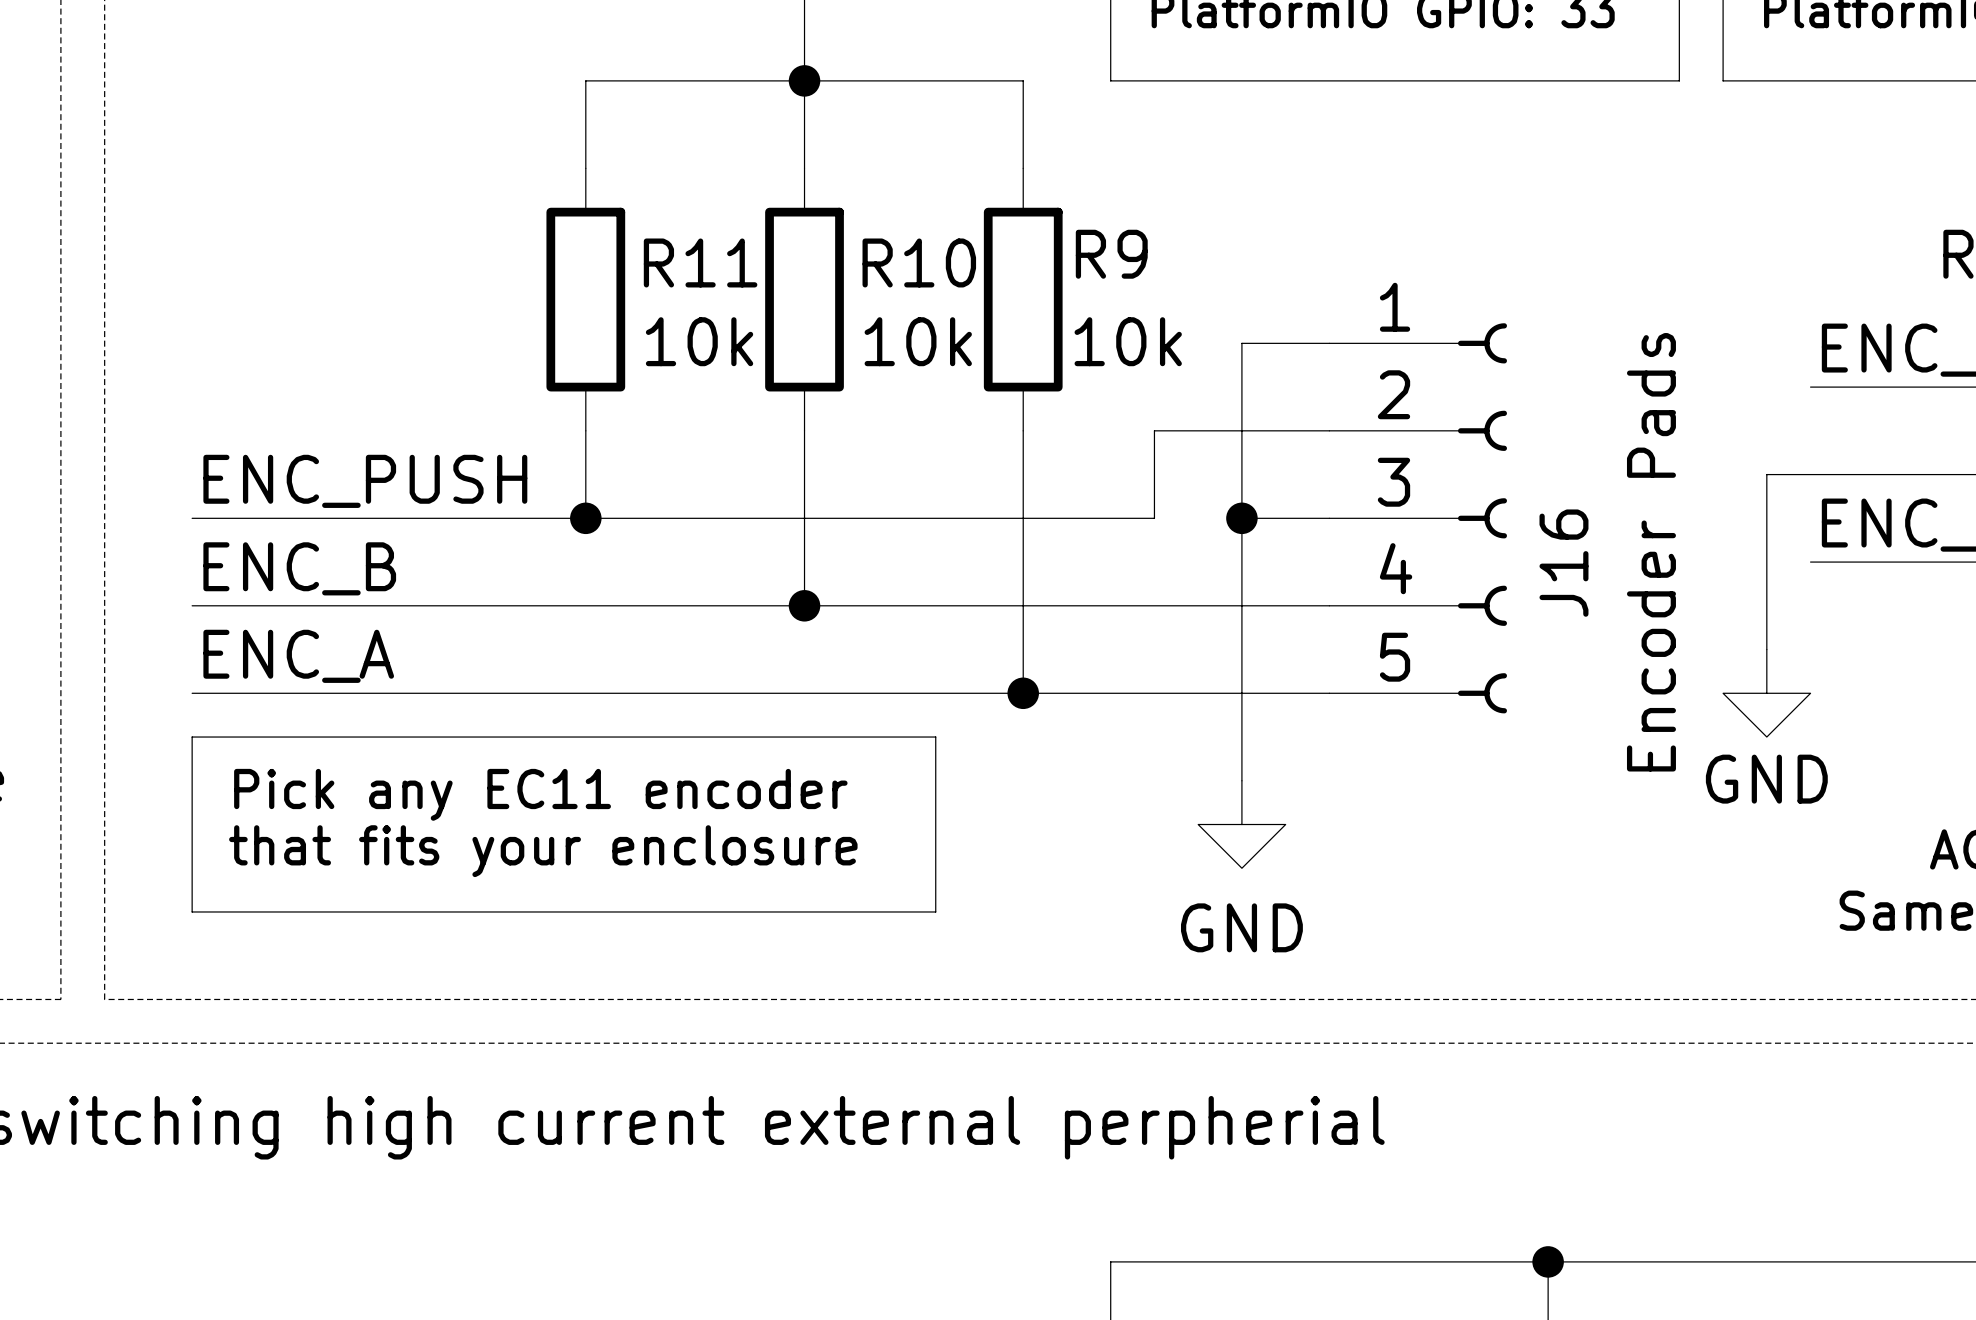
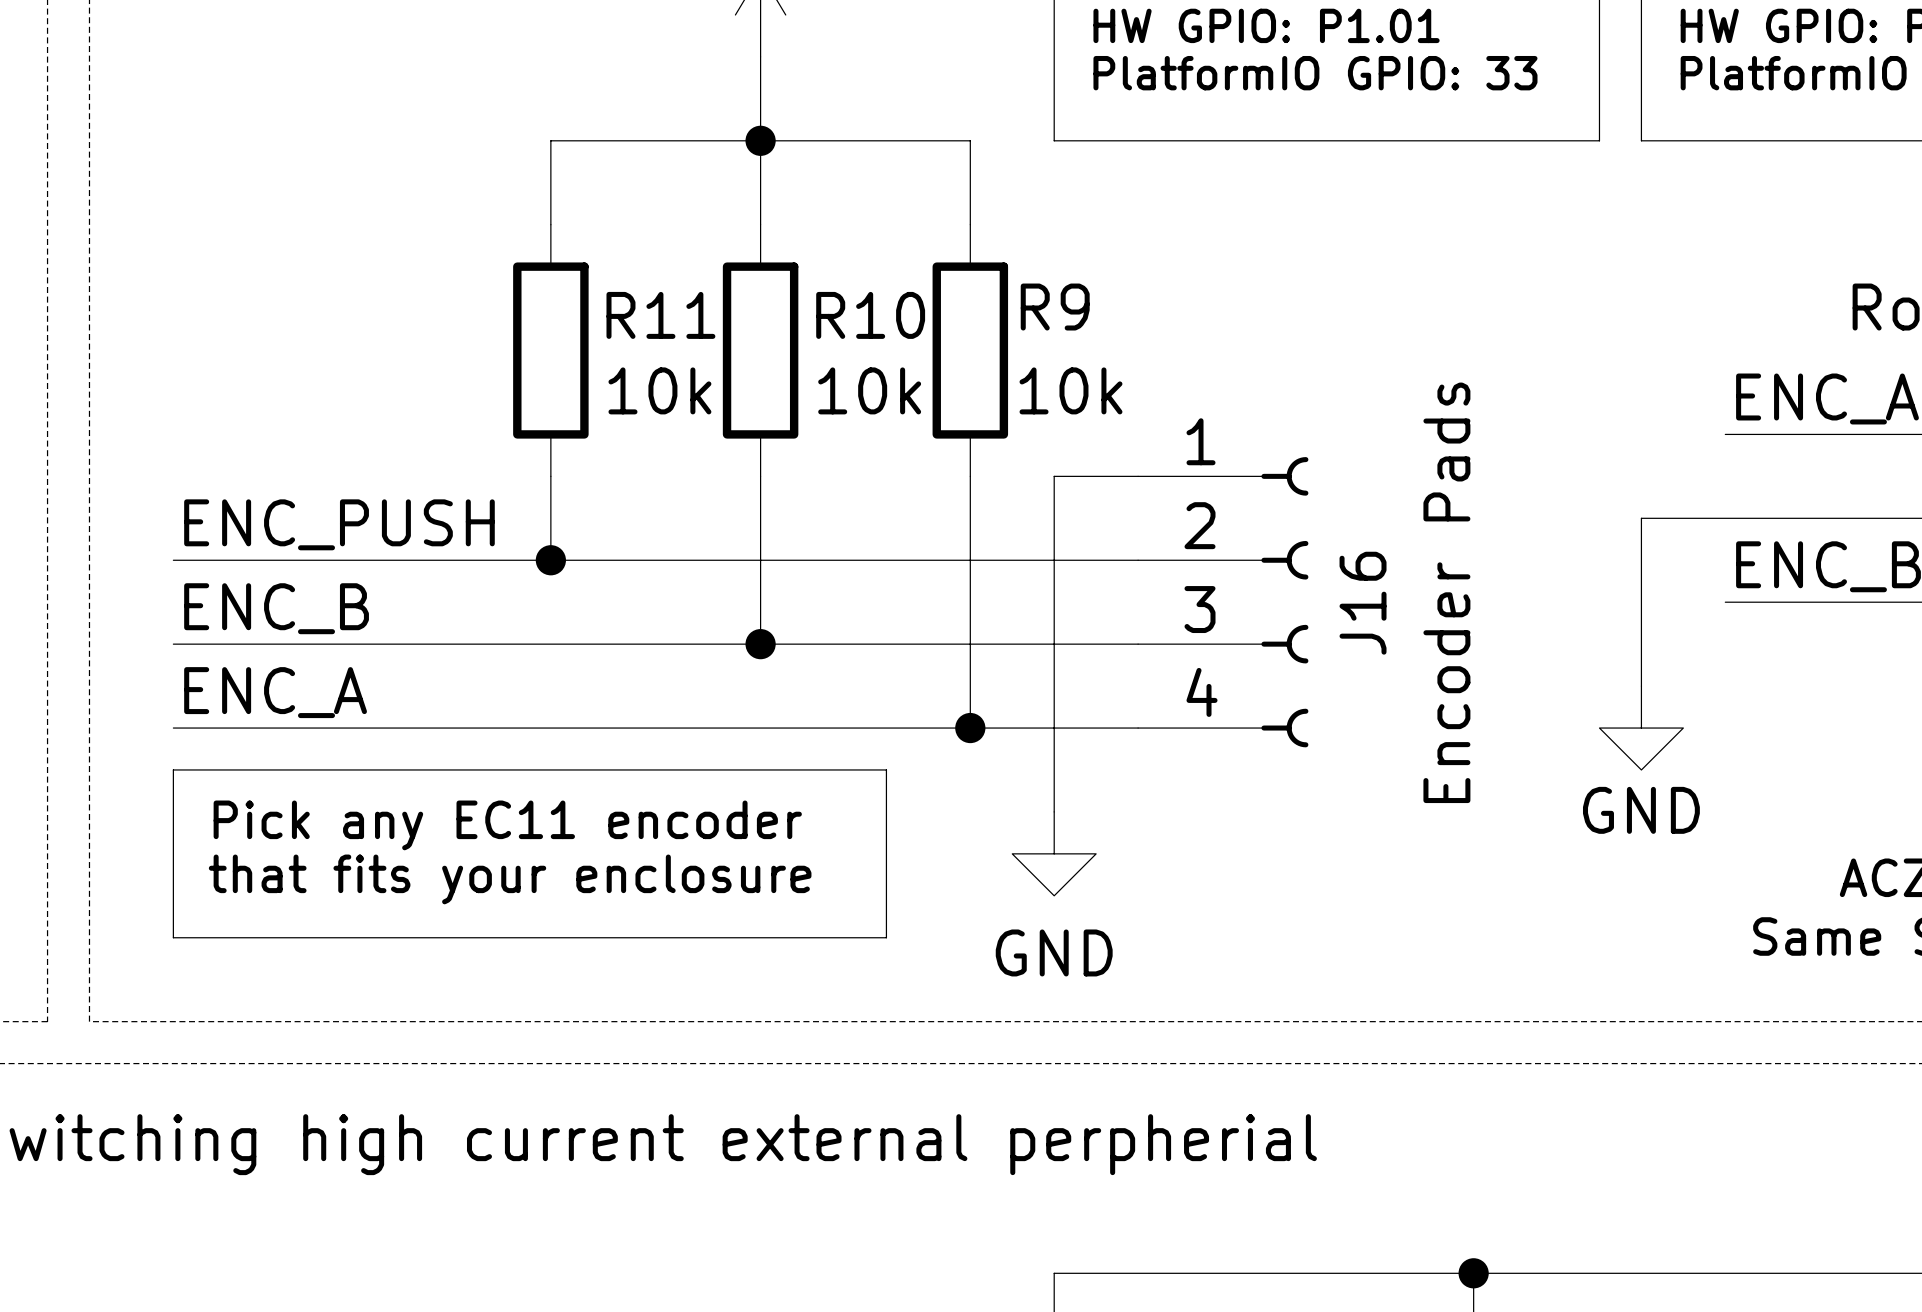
J16 symbol: [1329, 323, 1508, 714] -> [1138, 457, 1309, 748]
wire: (1329, 343) (1241, 343) (1241, 780) -> none
wire: (1154, 430) (1154, 518) -> (1138, 560) (1096, 560)
wire: none -> (1096, 476) (1054, 476) (1054, 811)
wire: (1766, 474) (1766, 649) -> (1683, 518) (1641, 518) (1641, 686)
junction: (1241, 518) -> none
power symbol position: GND (1766, 693) -> GND (1641, 728)
power symbol position: GND (1241, 824) -> GND (1054, 853)

